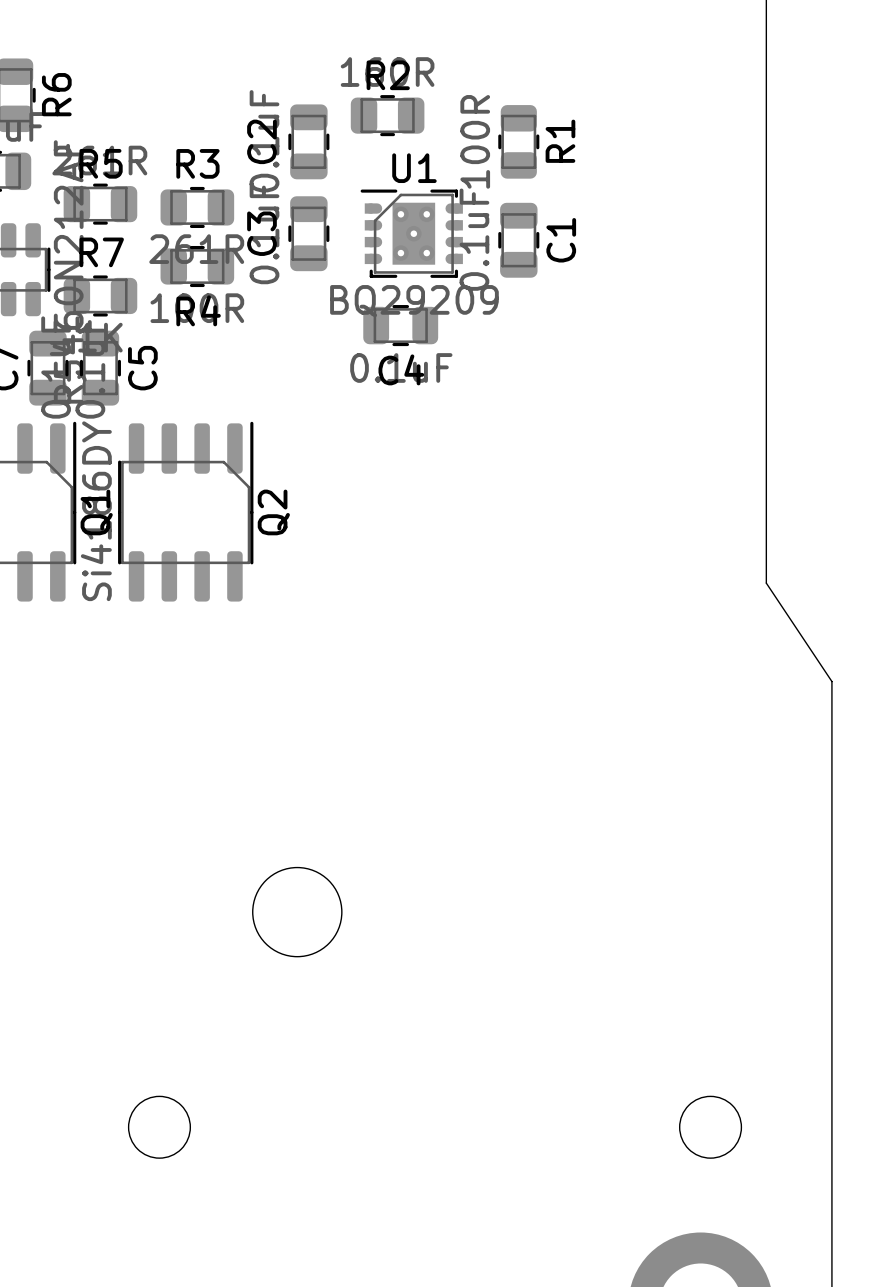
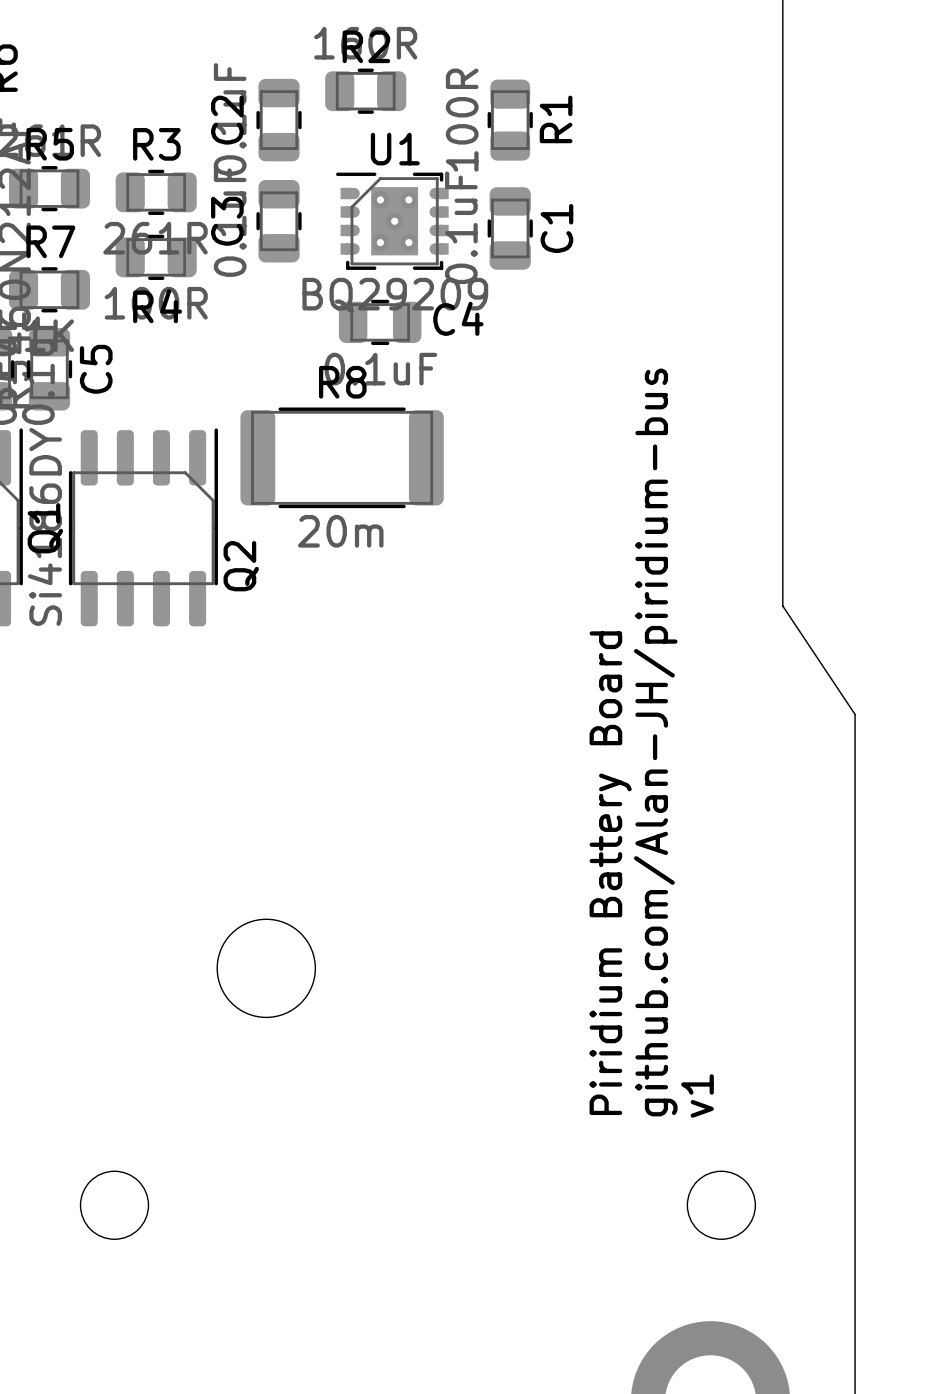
C4 name position: C4 (401, 369) -> C4 (458, 318)
R8: none -> 20m (342, 457)
Q2 name position: Q2 (273, 512) -> Q2 (241, 566)
text: none -> github.com/Alan-JH/piridium-bus (655, 742)
text: none -> Piridium Battery Board (610, 873)
text: none -> v1 (697, 1095)

